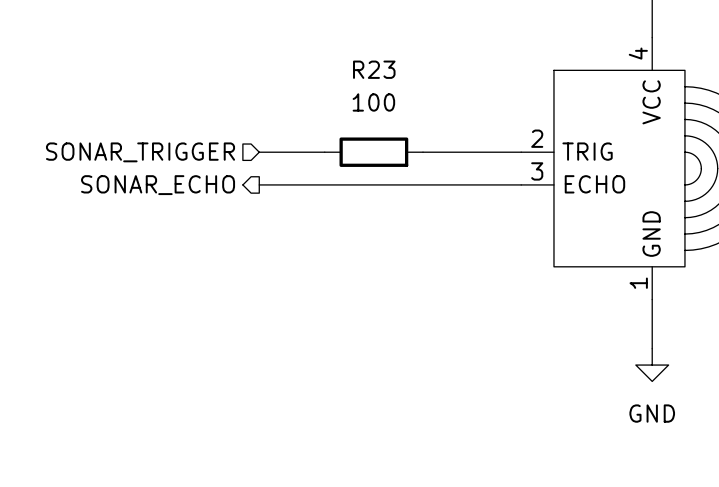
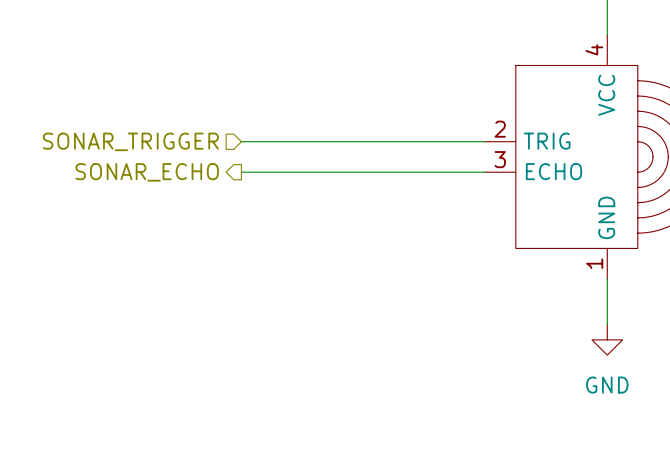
wire: none -> (302, 141) (393, 141)
R23: 100 (373, 152) -> none

